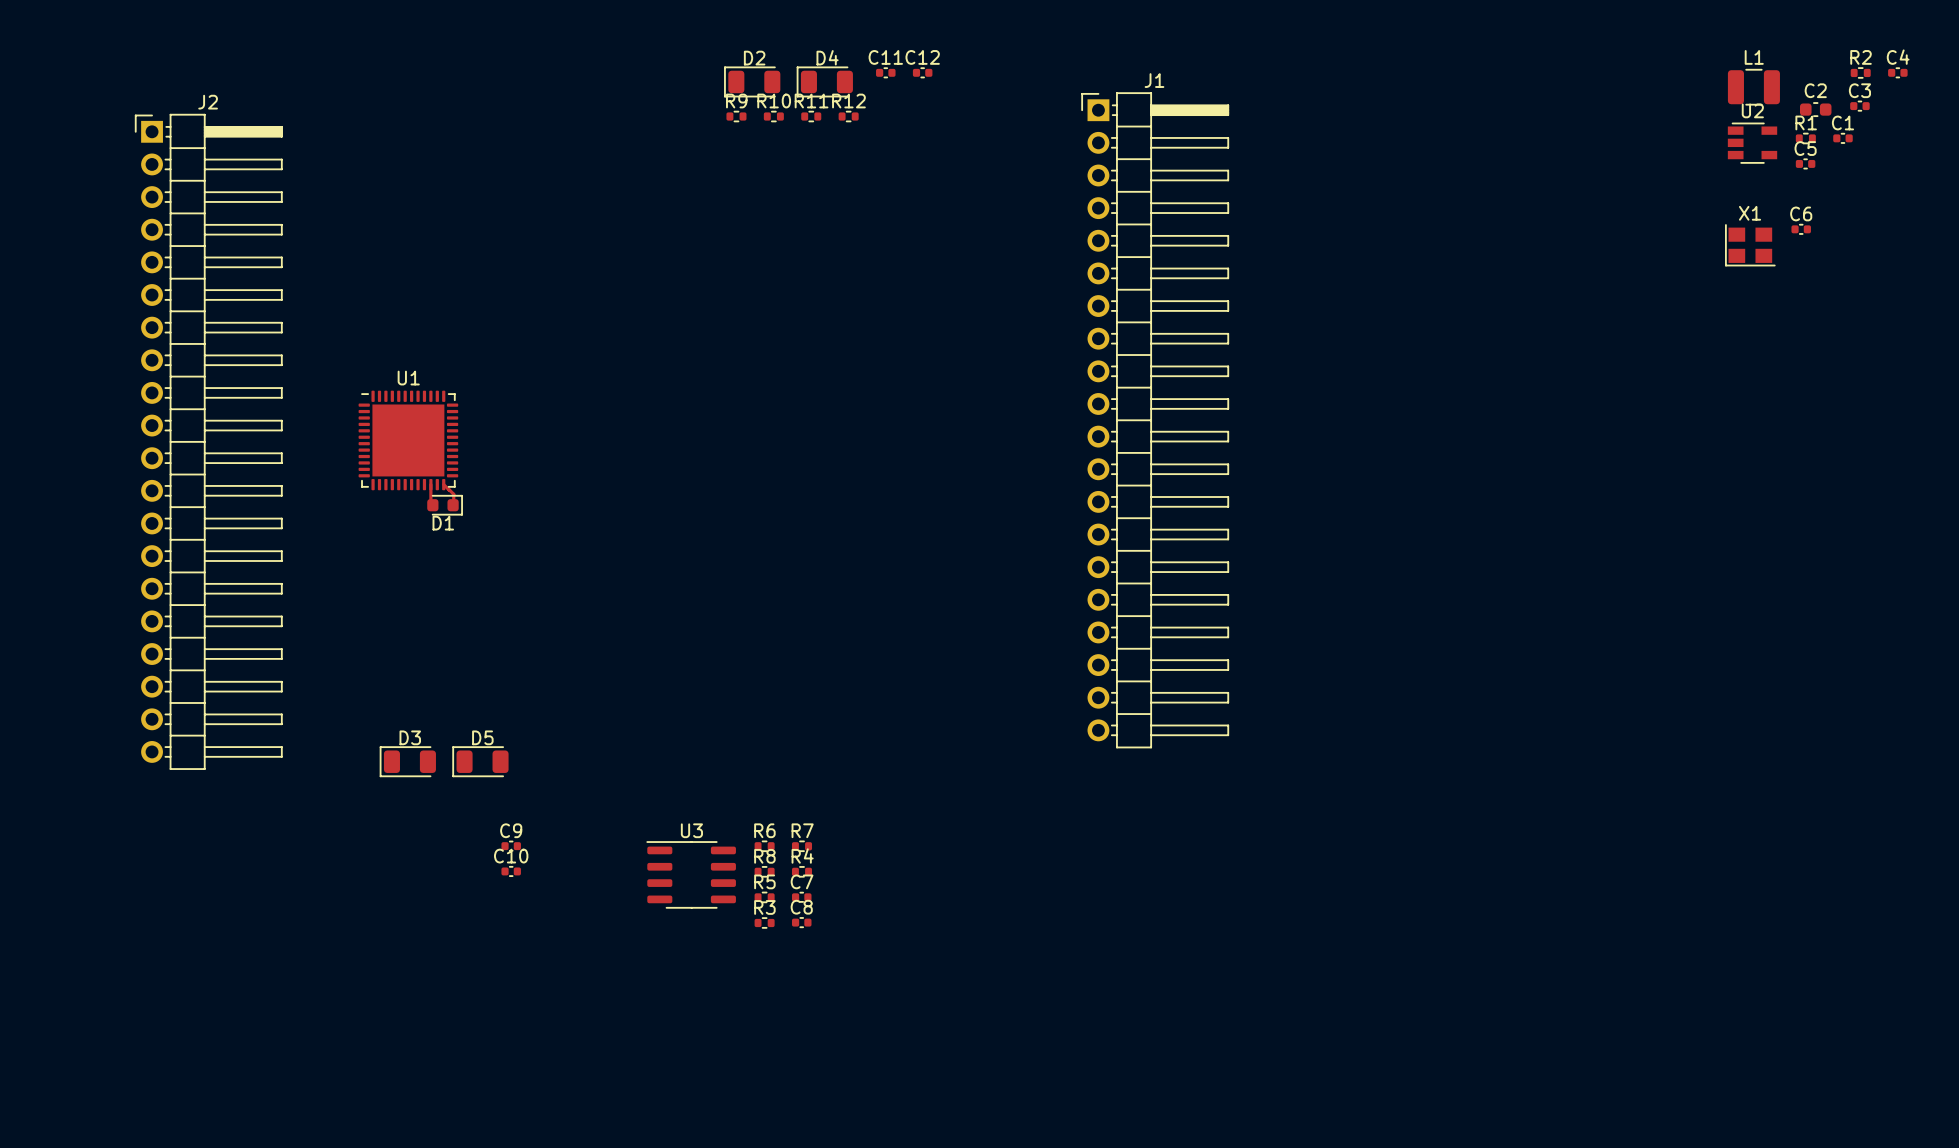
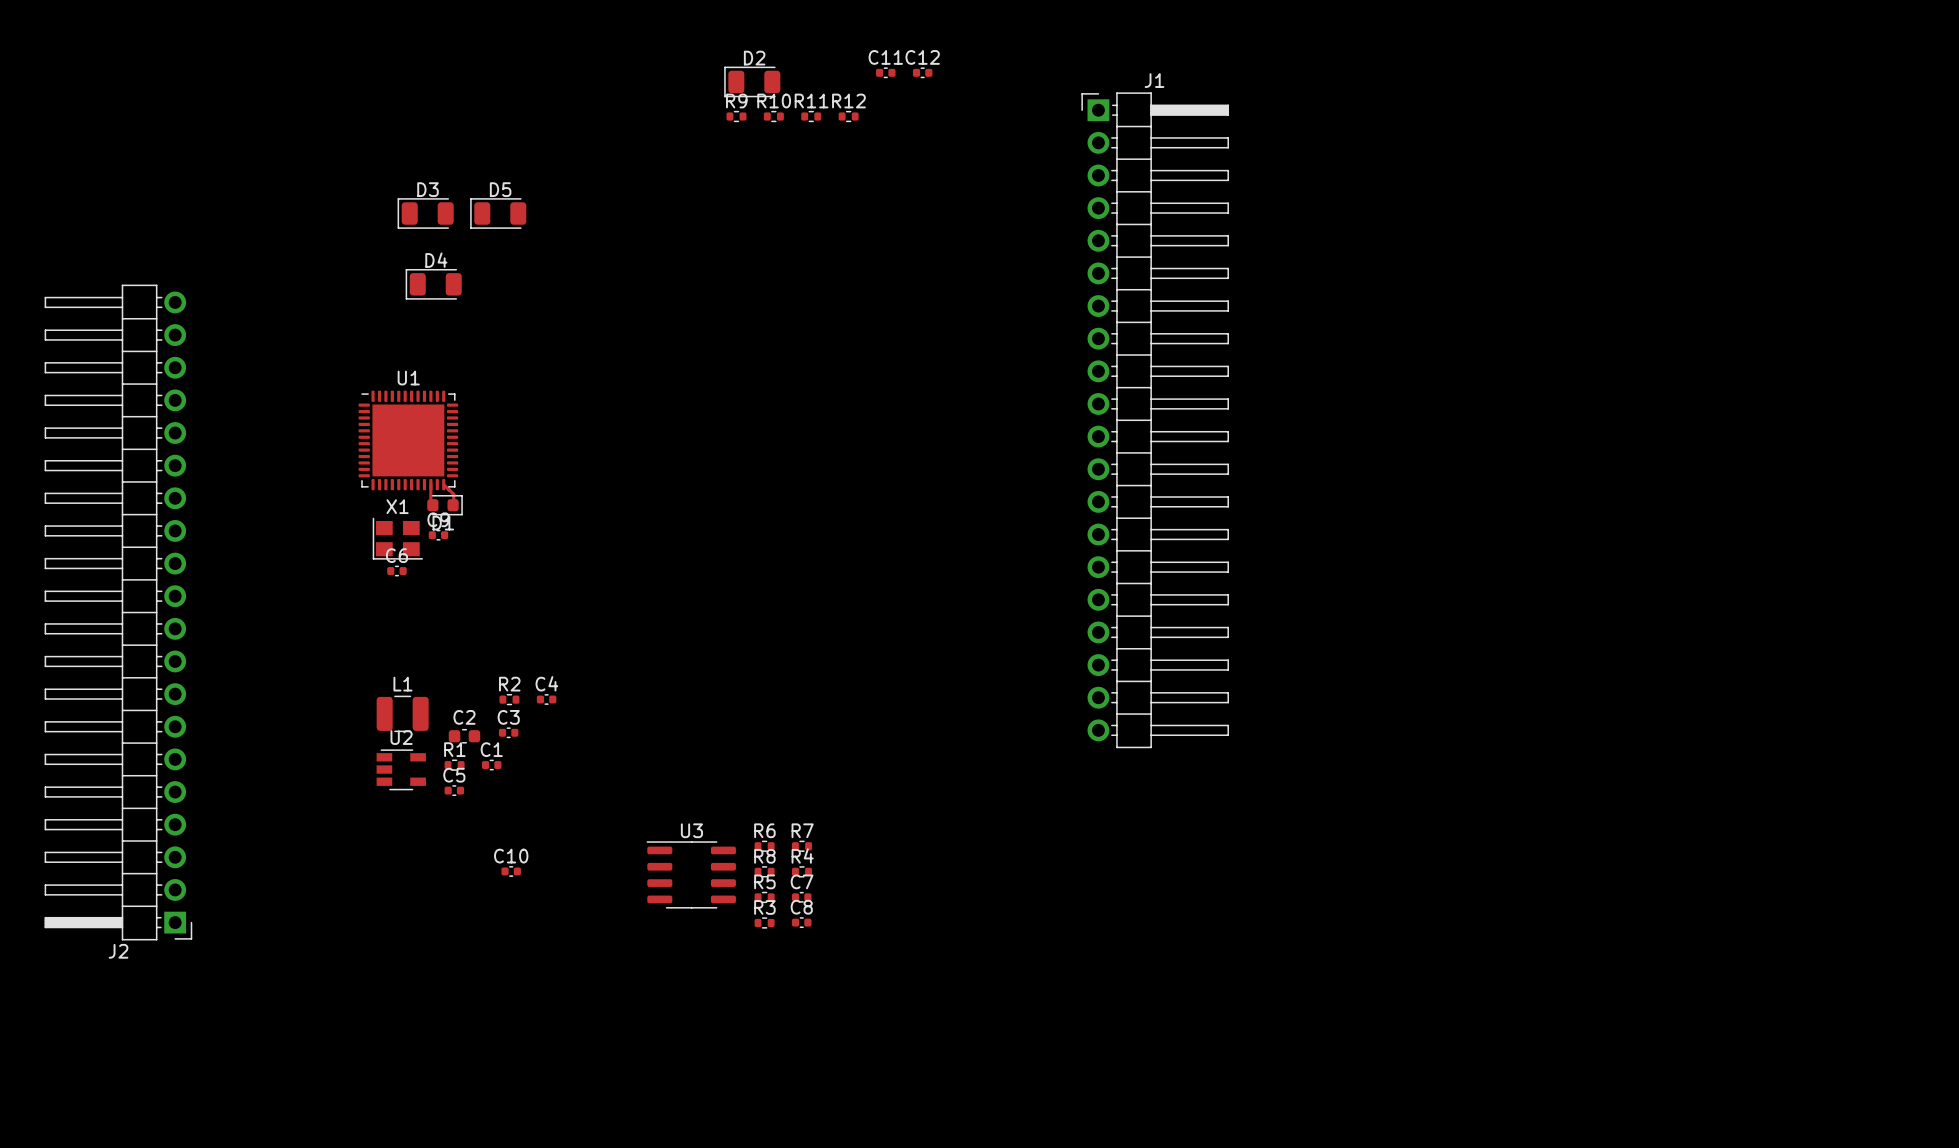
R2 position: (1860, 72) -> (509, 699)
C4 position: (1897, 72) -> (546, 699)
D4 position: (824, 81) -> (433, 284)
L1 position: (1753, 87) -> (402, 713)
C3 position: (1859, 106) -> (508, 732)
C2 position: (1815, 109) -> (464, 736)
R1 position: (1805, 138) -> (454, 765)
C1 position: (1842, 138) -> (491, 765)
U2 position: (1752, 143) -> (401, 769)
C5 position: (1805, 163) -> (454, 790)
C6 position: (1801, 229) -> (396, 571)
X1 position: (1750, 245) -> (397, 538)
J2 rotation: 0° (208, 441) -> 180° (118, 612)
D3 position: (407, 761) -> (425, 213)
D5 position: (480, 761) -> (498, 213)
C9 position: (511, 846) -> (438, 535)

